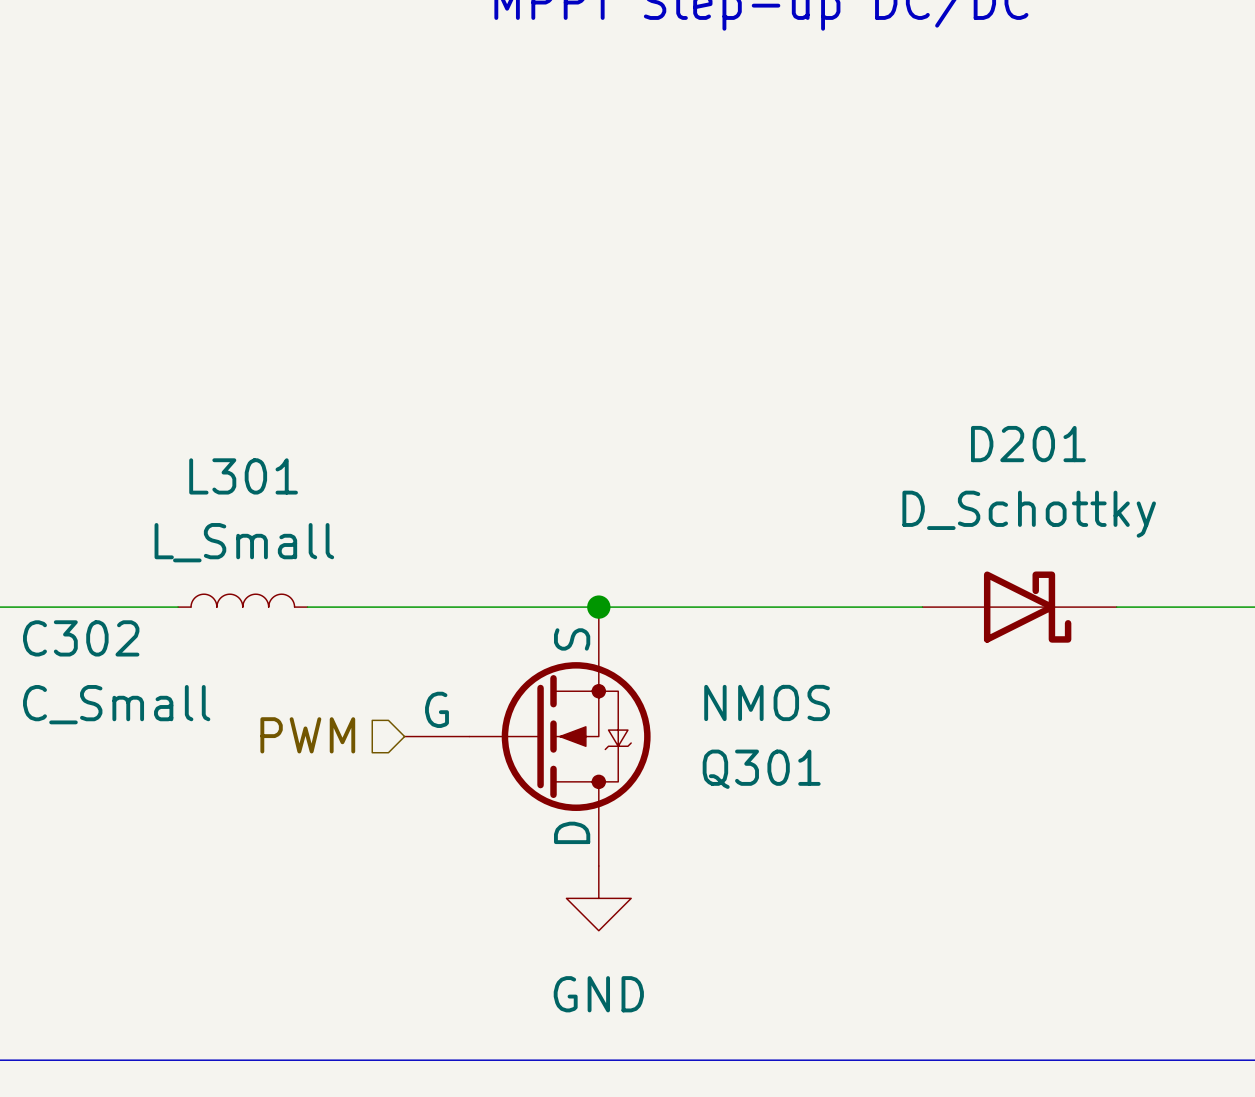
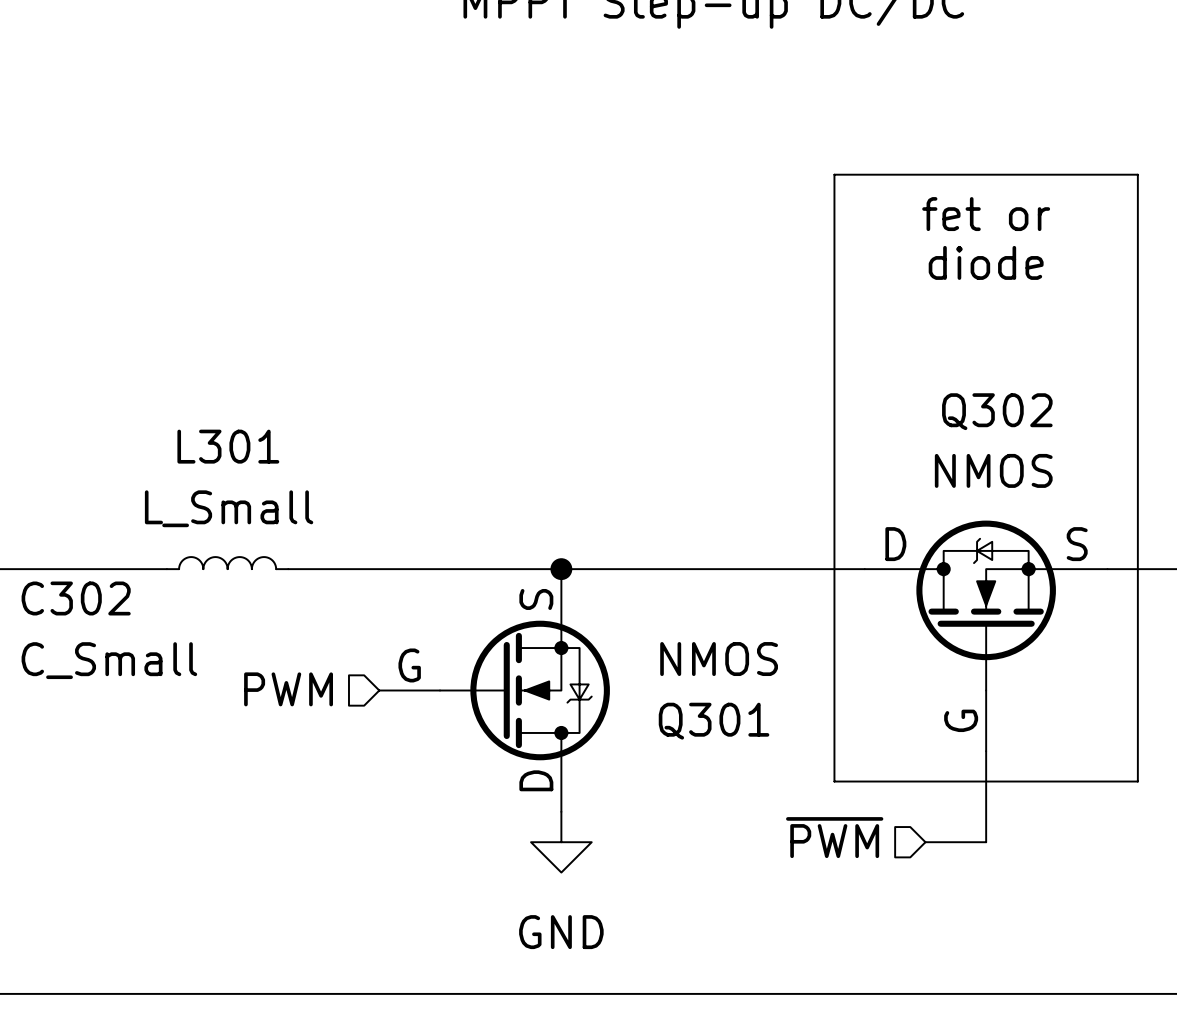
line: none -> (834, 174) (1137, 174) (1137, 781) (834, 781) (834, 174)
text: none -> fet or (986, 214)
text: none -> diode (986, 262)
D201: D_Schottky (1019, 607) -> none
Q302: none -> NMOS (986, 635)
wire: none -> (986, 751) (986, 842) (925, 842)
hierarchical label: none -> ~{PWM} (834, 837)

